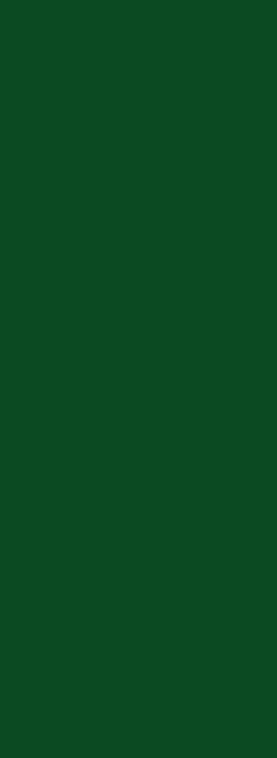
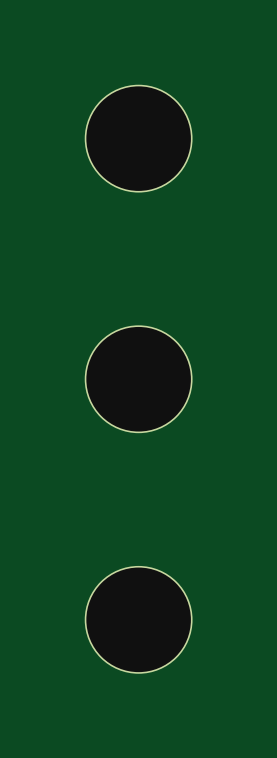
part: none -> (138, 138)
part: none -> (138, 379)
part: none -> (138, 619)

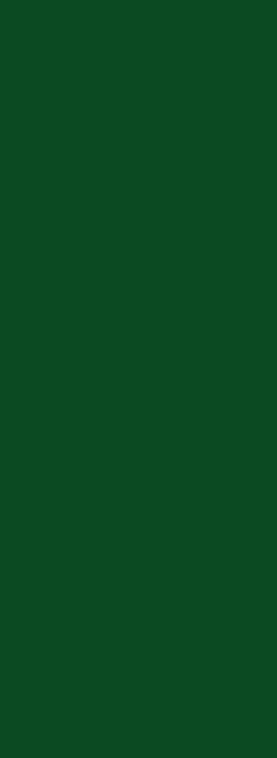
part: (138, 138) -> none
part: (138, 379) -> none
part: (138, 619) -> none

